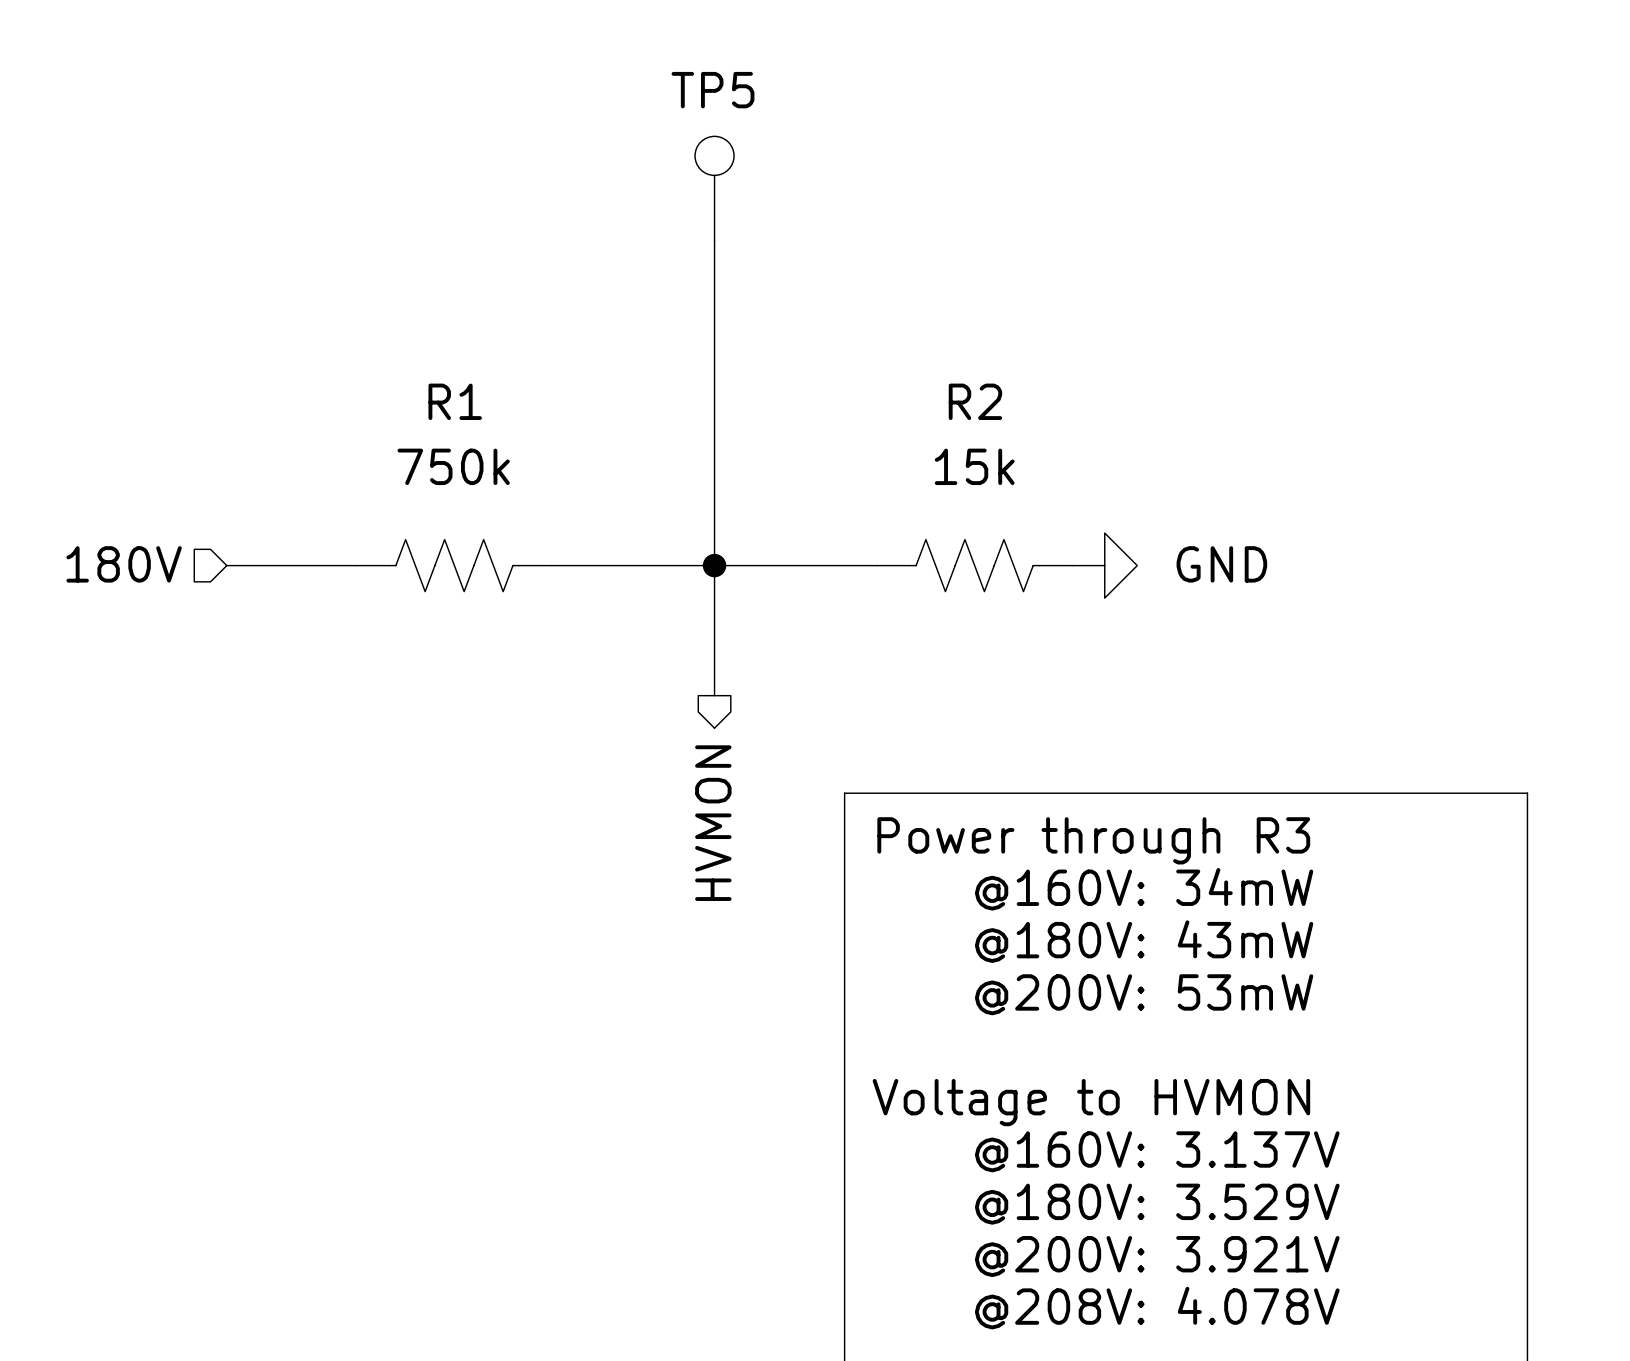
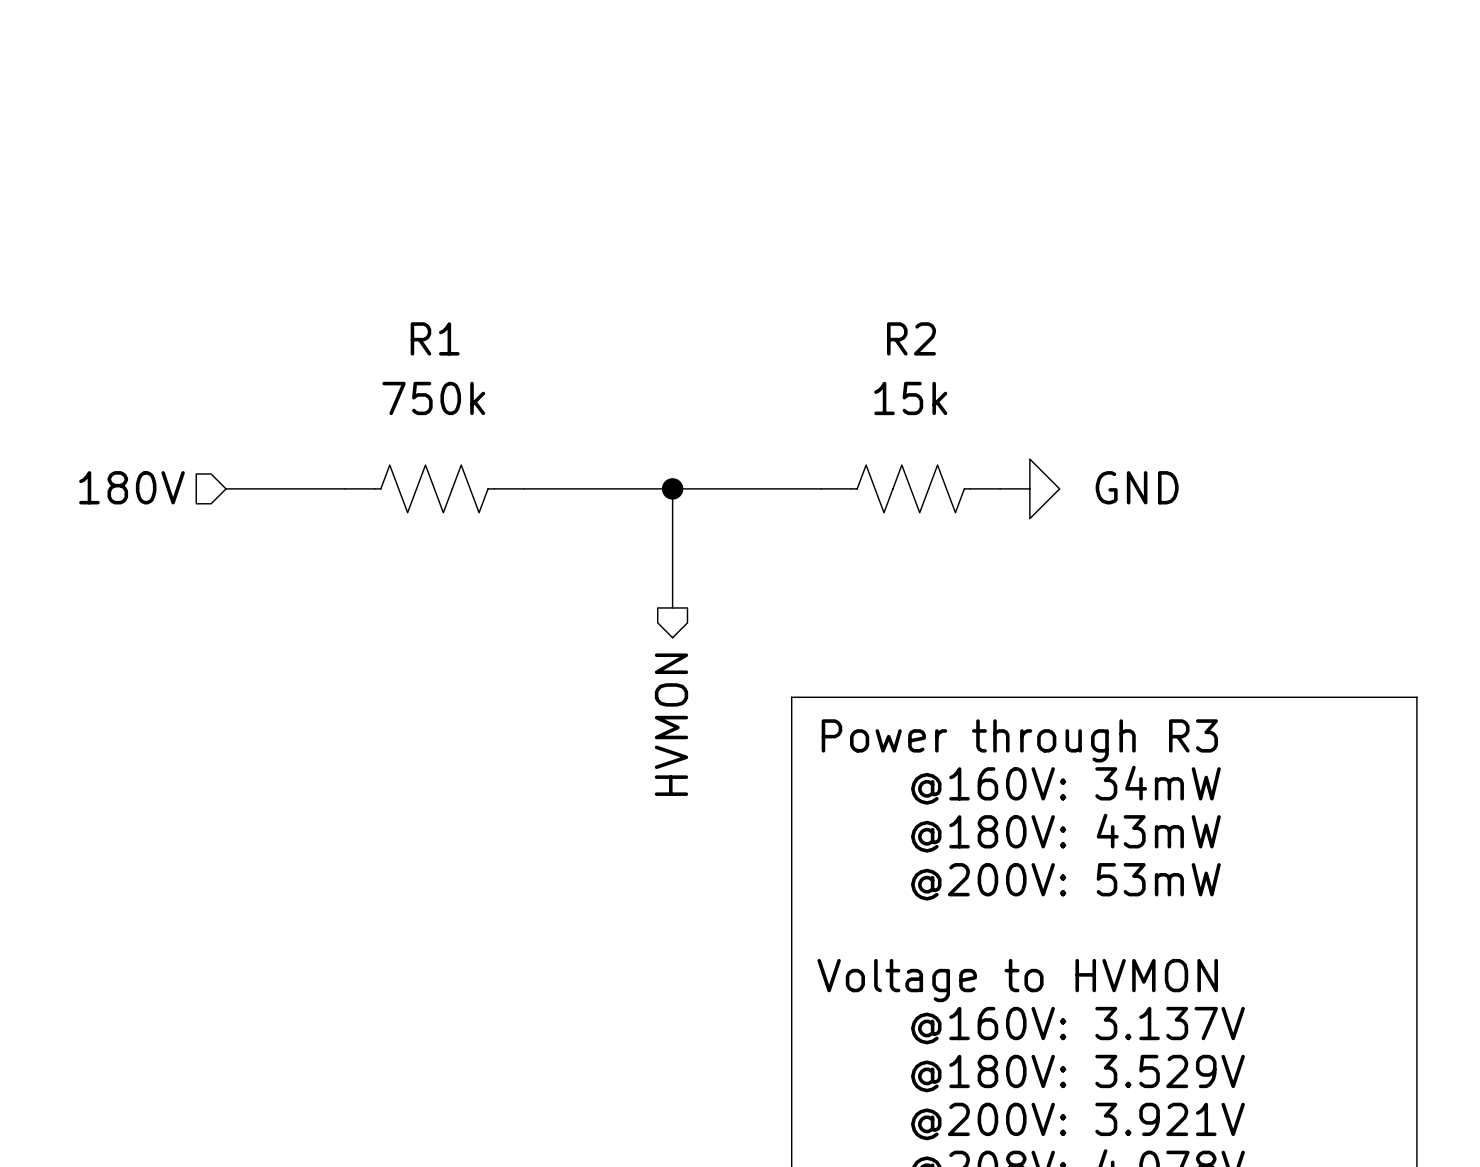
TP5: (714, 188) -> none
wire: (714, 240) (714, 565) -> none

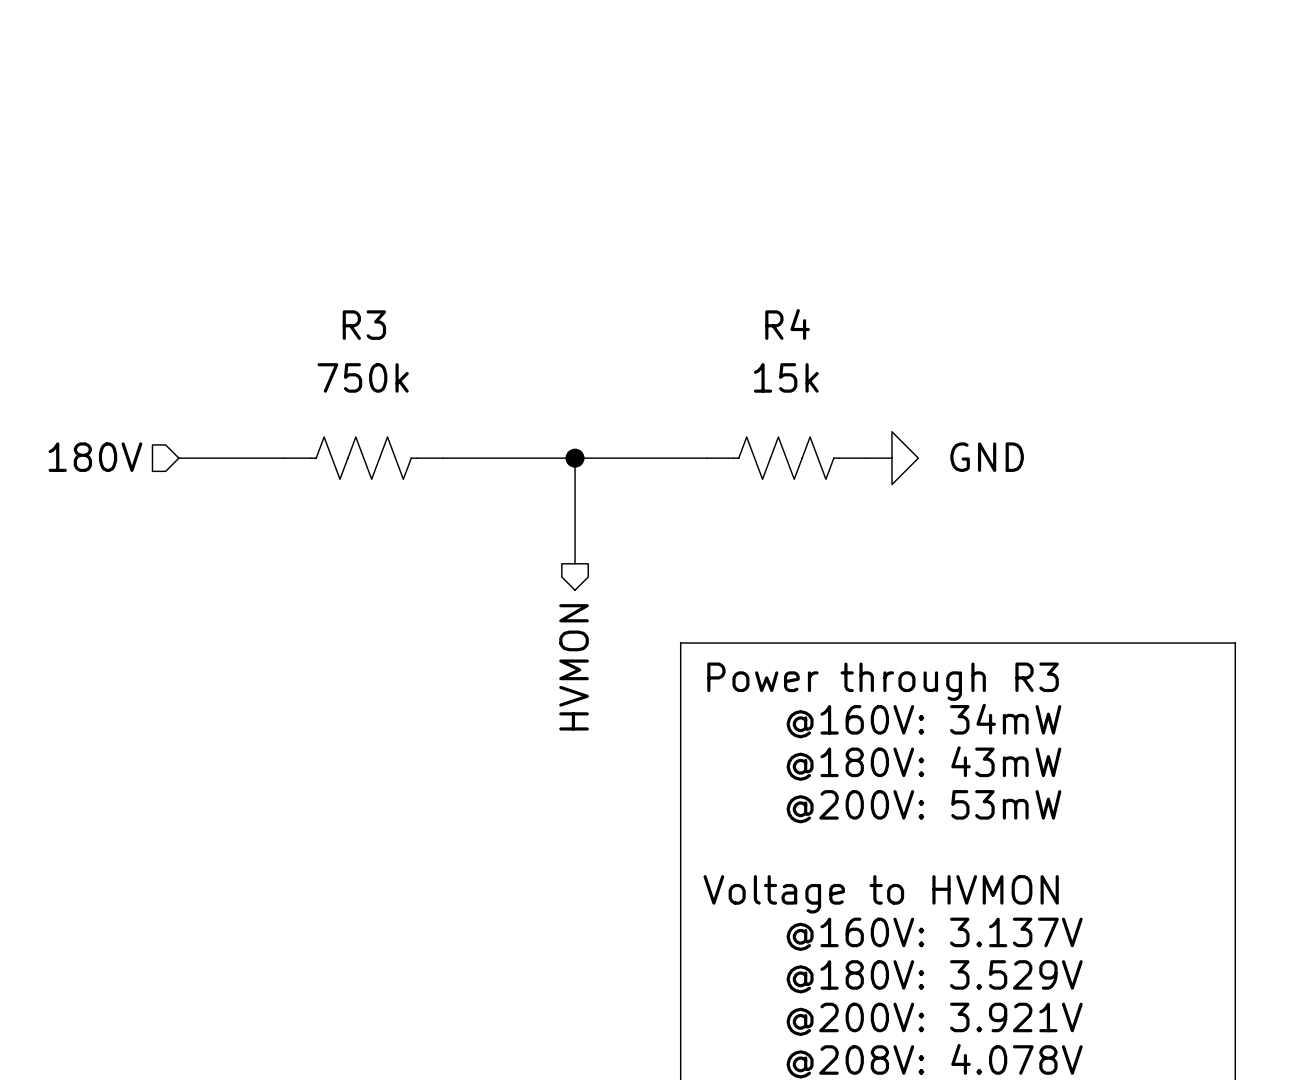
R1 name: R1 (435, 338) -> R3 (364, 325)
R2 name: R2 (911, 338) -> R4 (787, 324)

